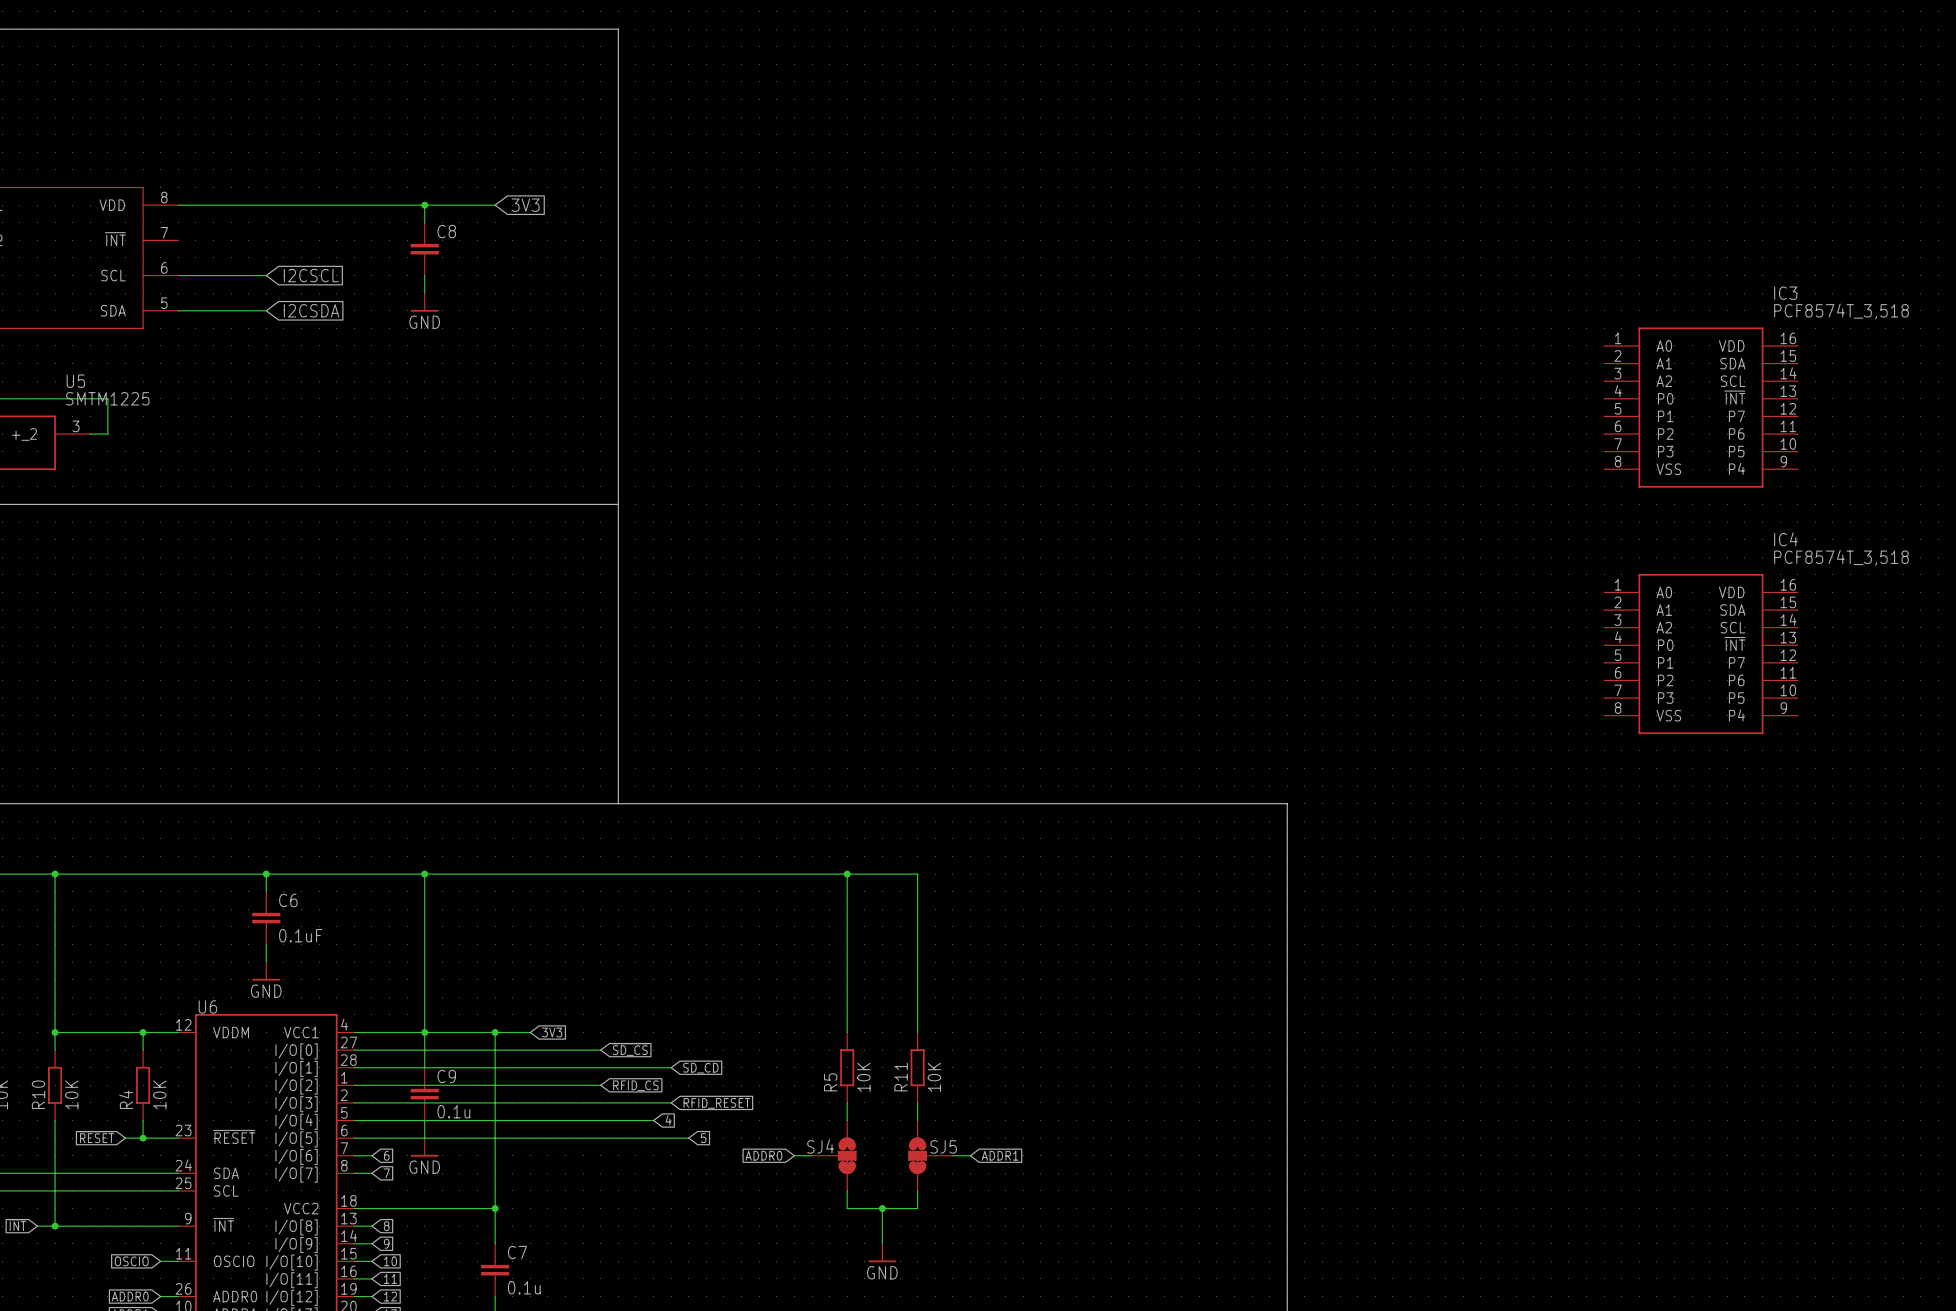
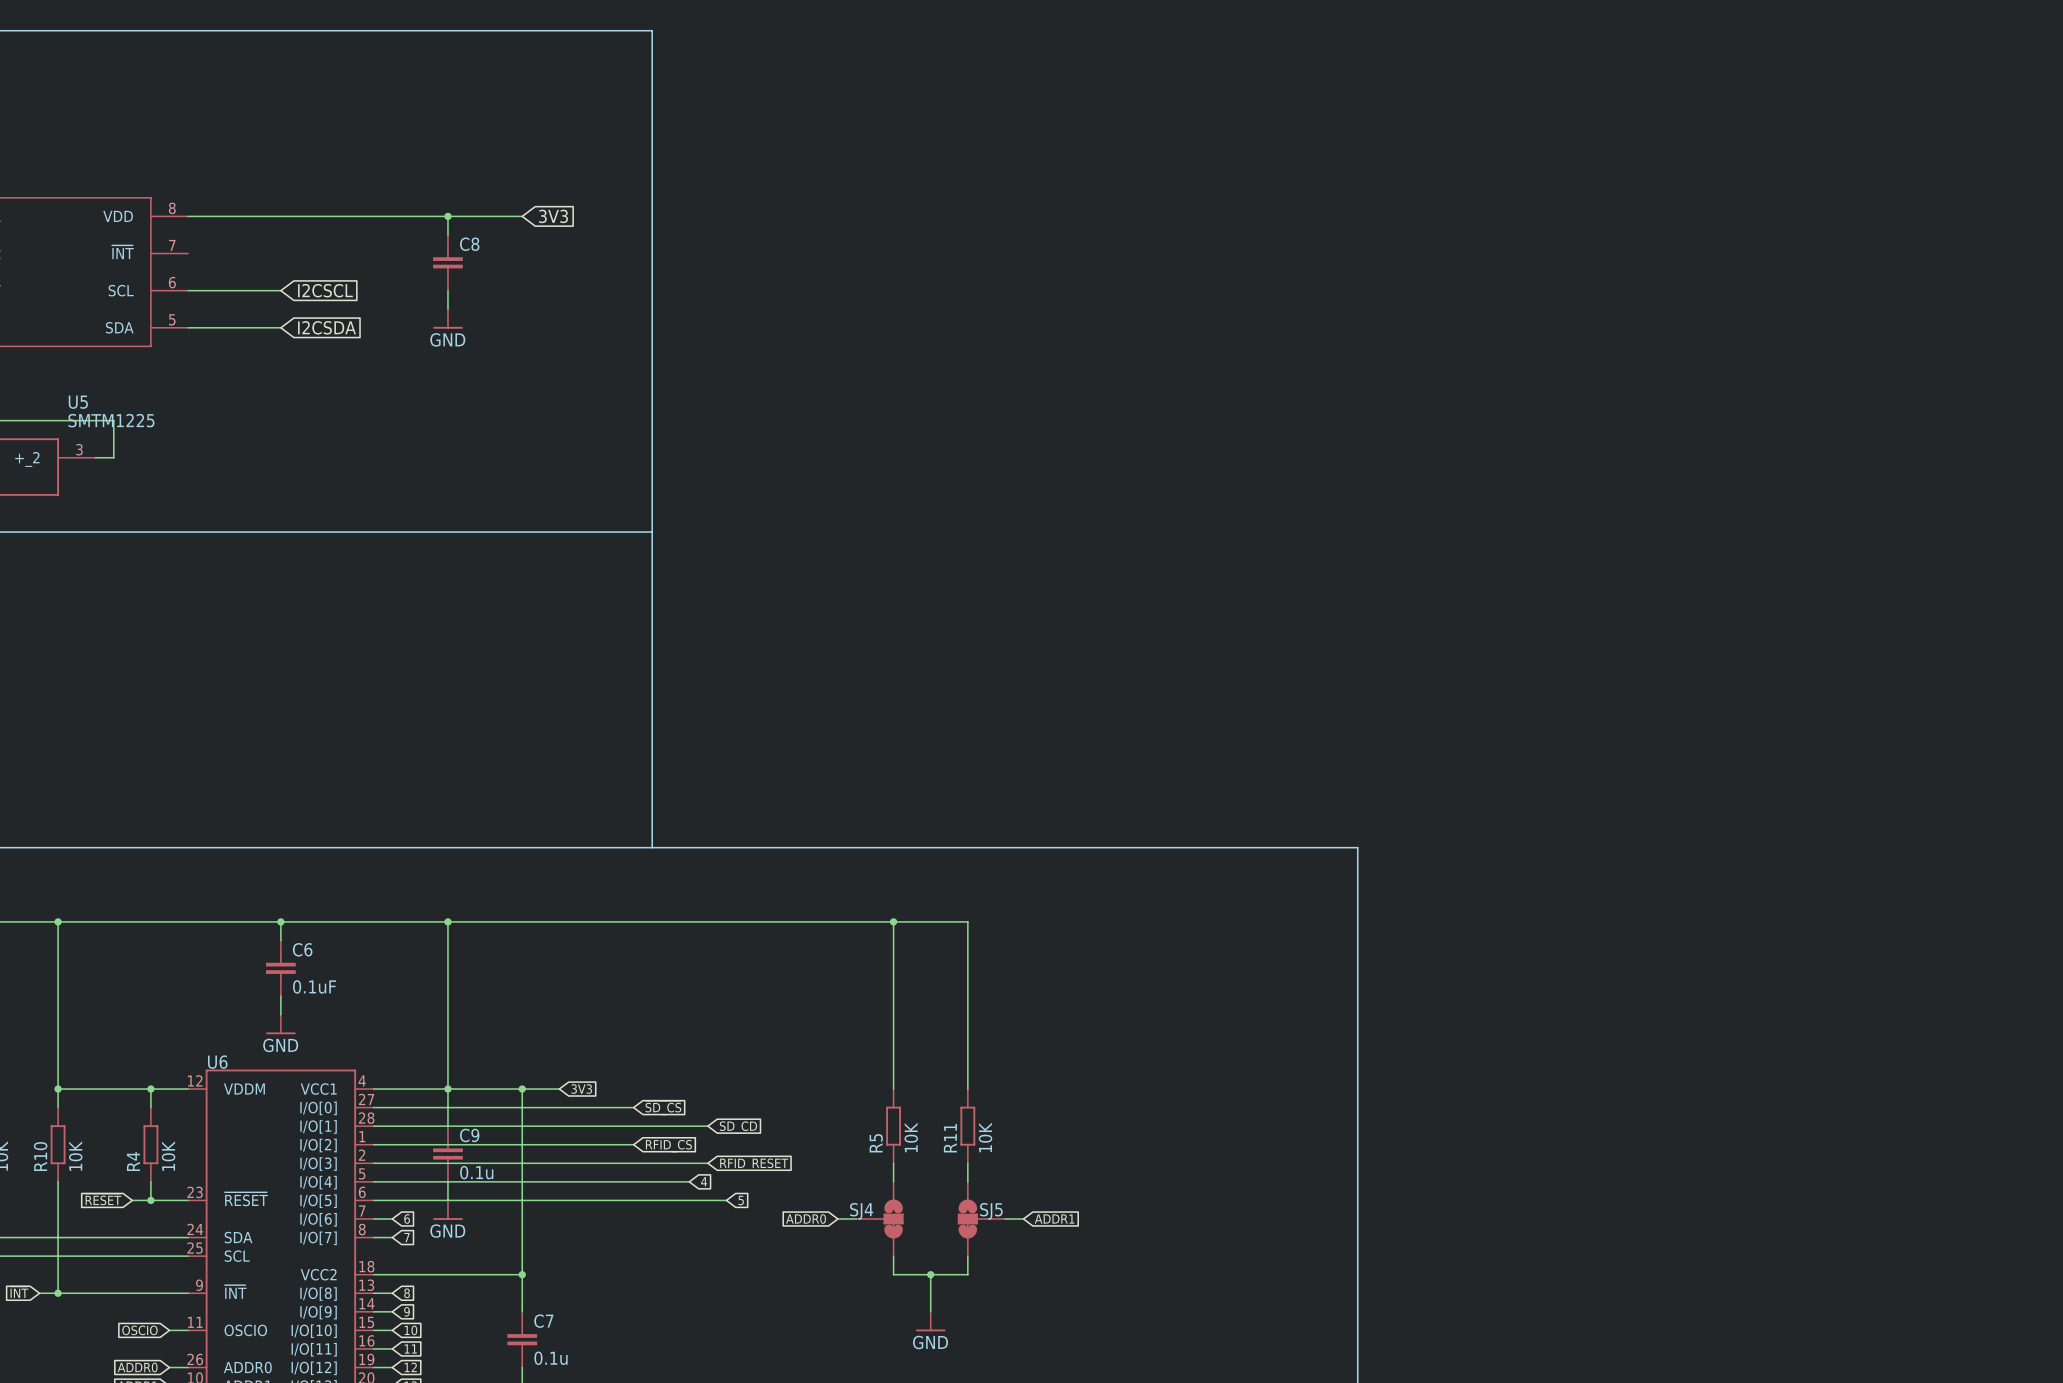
IC3: PCF8574T_3,518 (1700, 407) -> none
IC4: PCF8574T_3,518 (1700, 654) -> none

